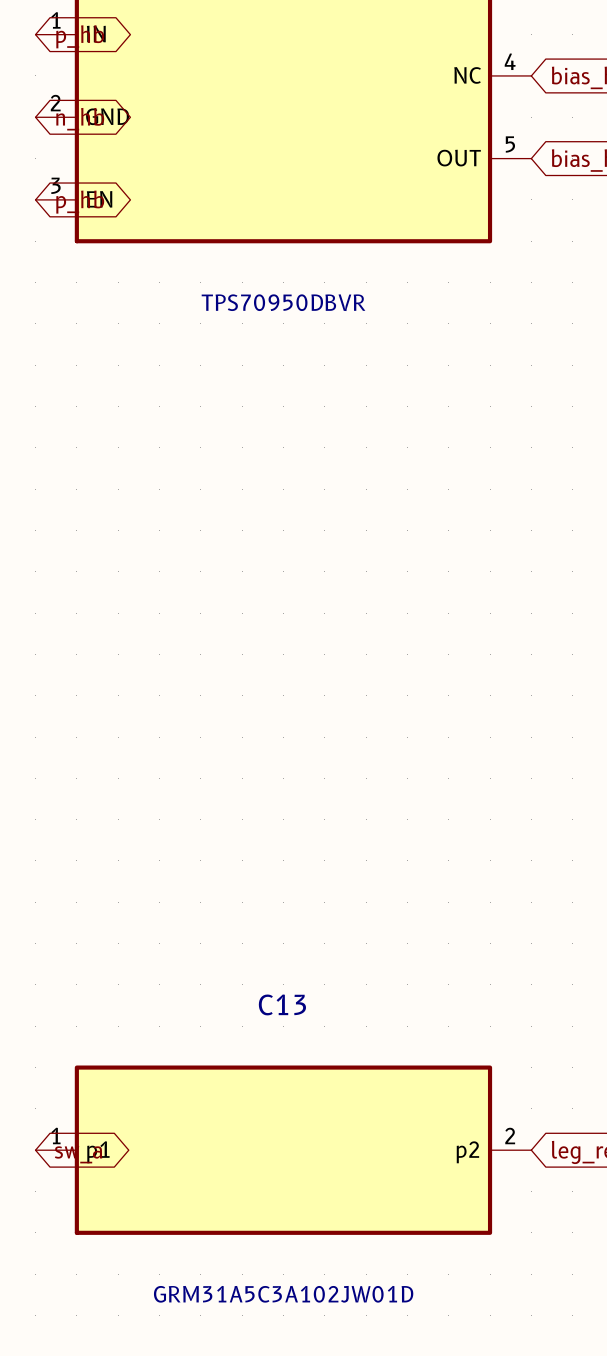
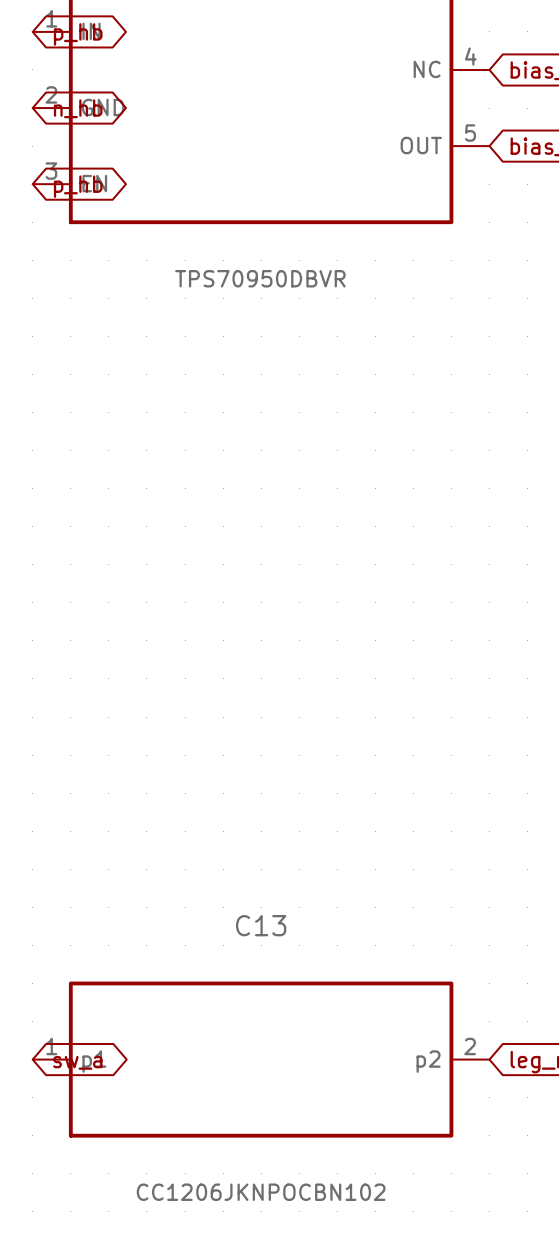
C13 value: GRM31A5C3A102JW01D (283, 1294) -> CC1206JKNPOCBN102 (261, 1192)

